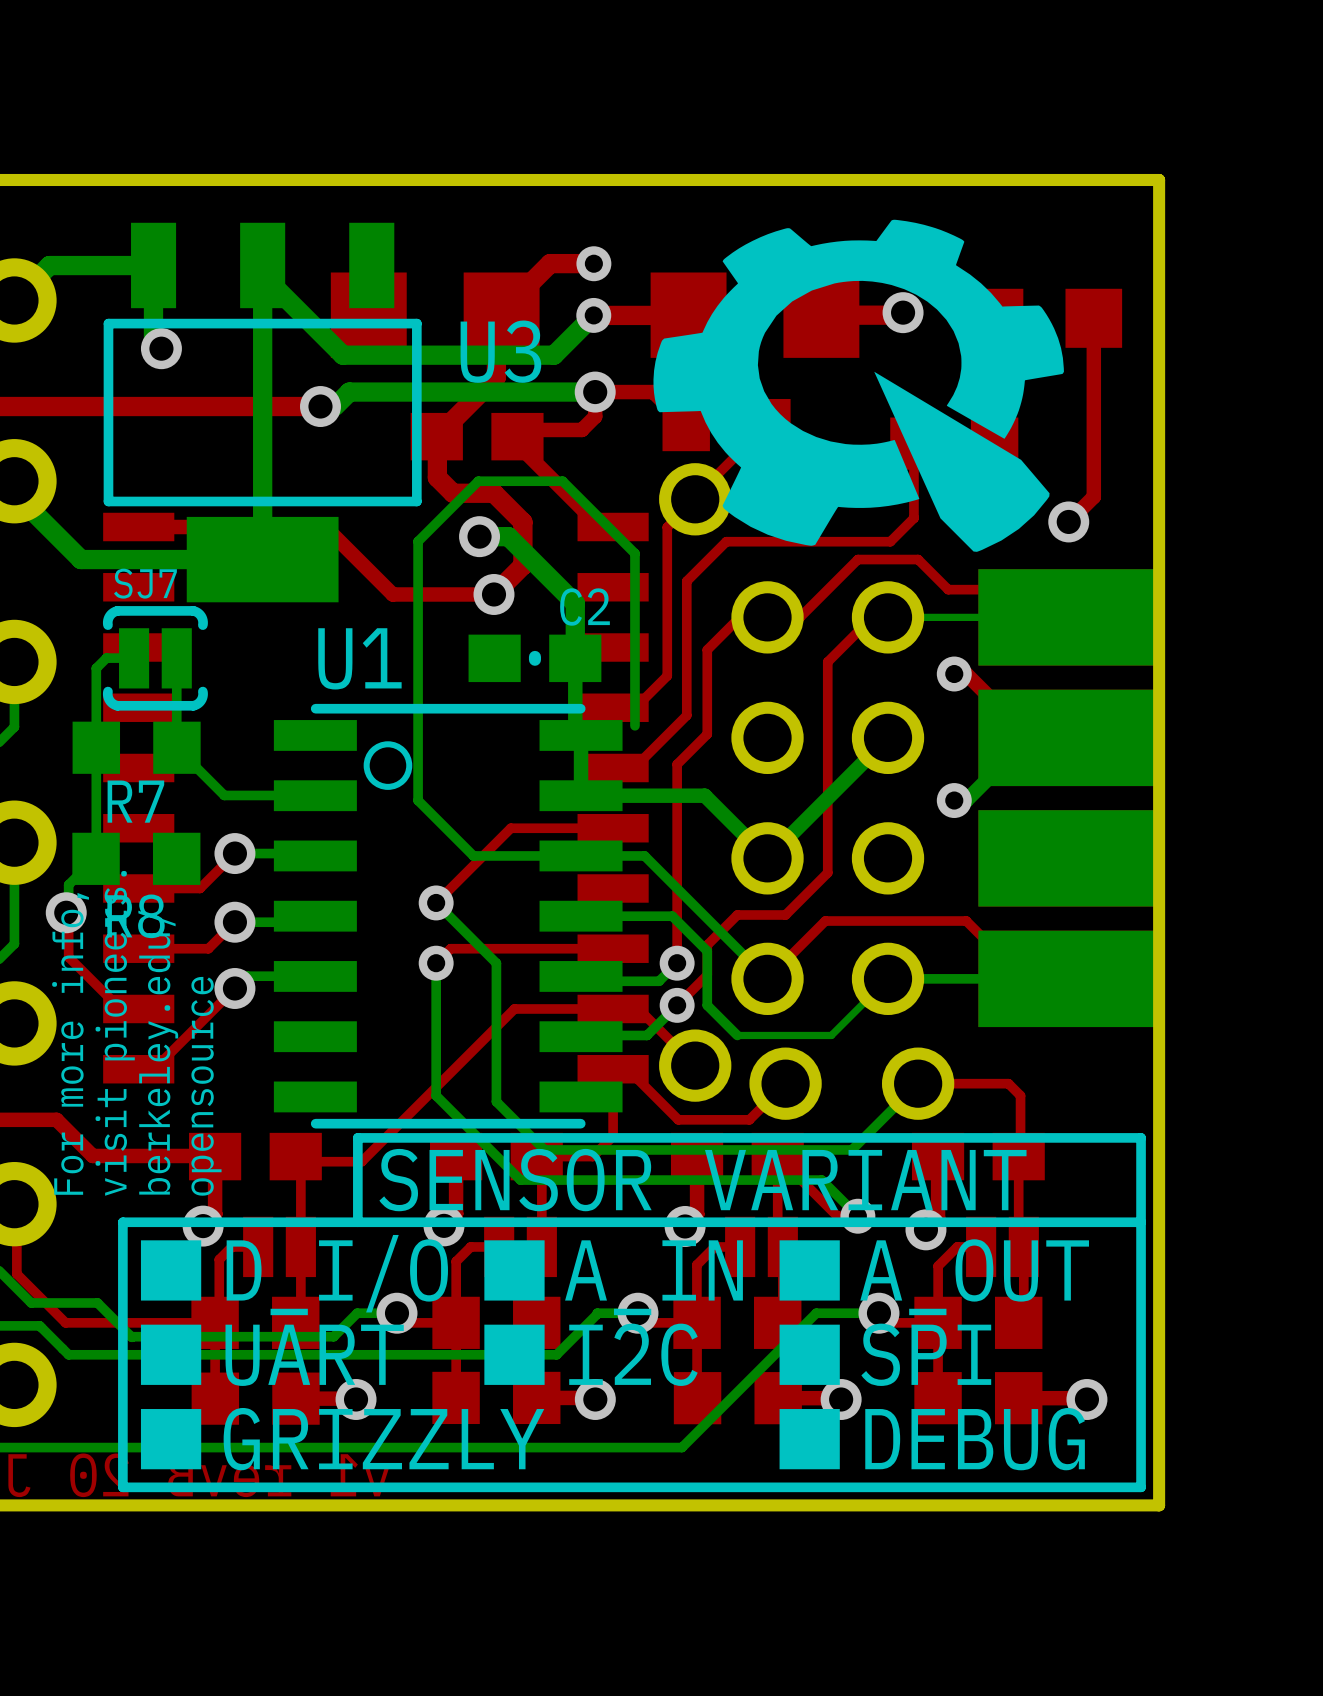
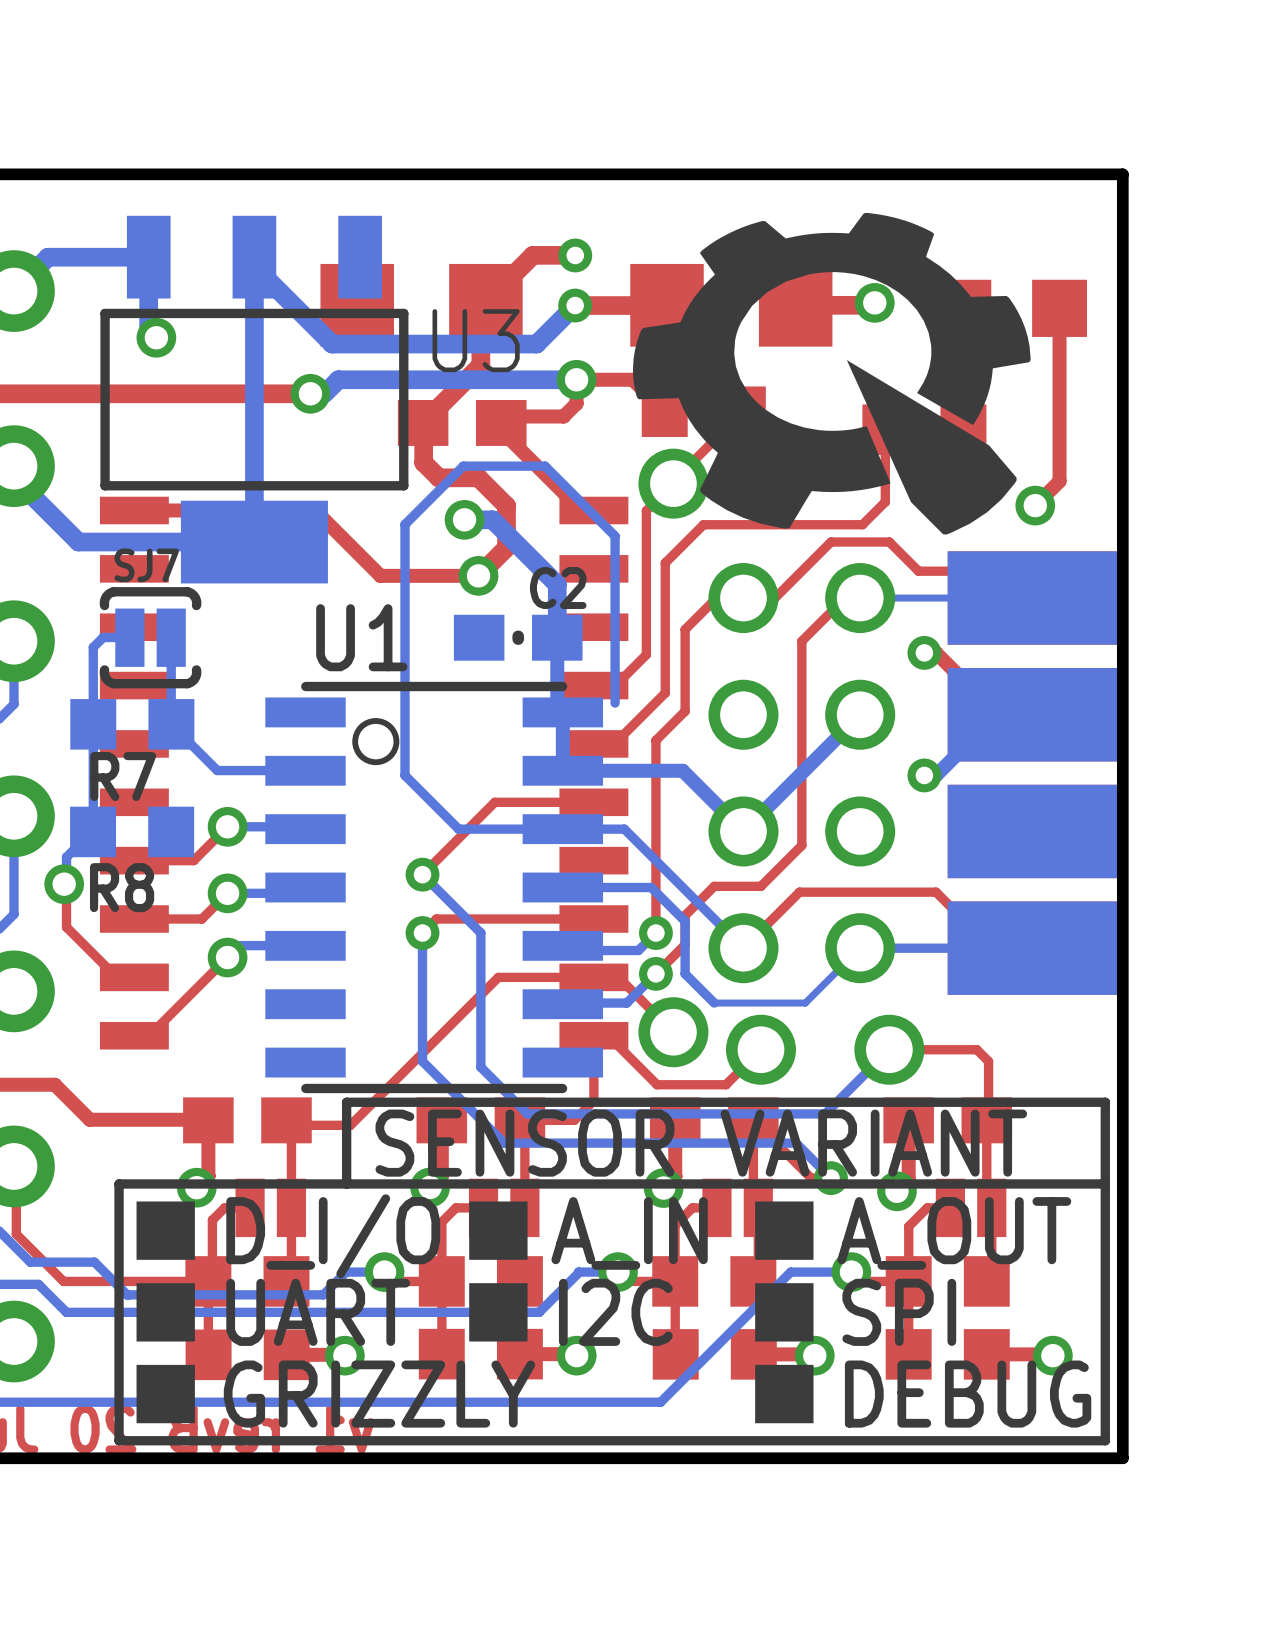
text: visit pioneers. (115, 1033) -> none
text: For more info, (70, 1043) -> none
text: berkeley.edu/ (158, 1052) -> none
text: opensource (206, 1086) -> none

